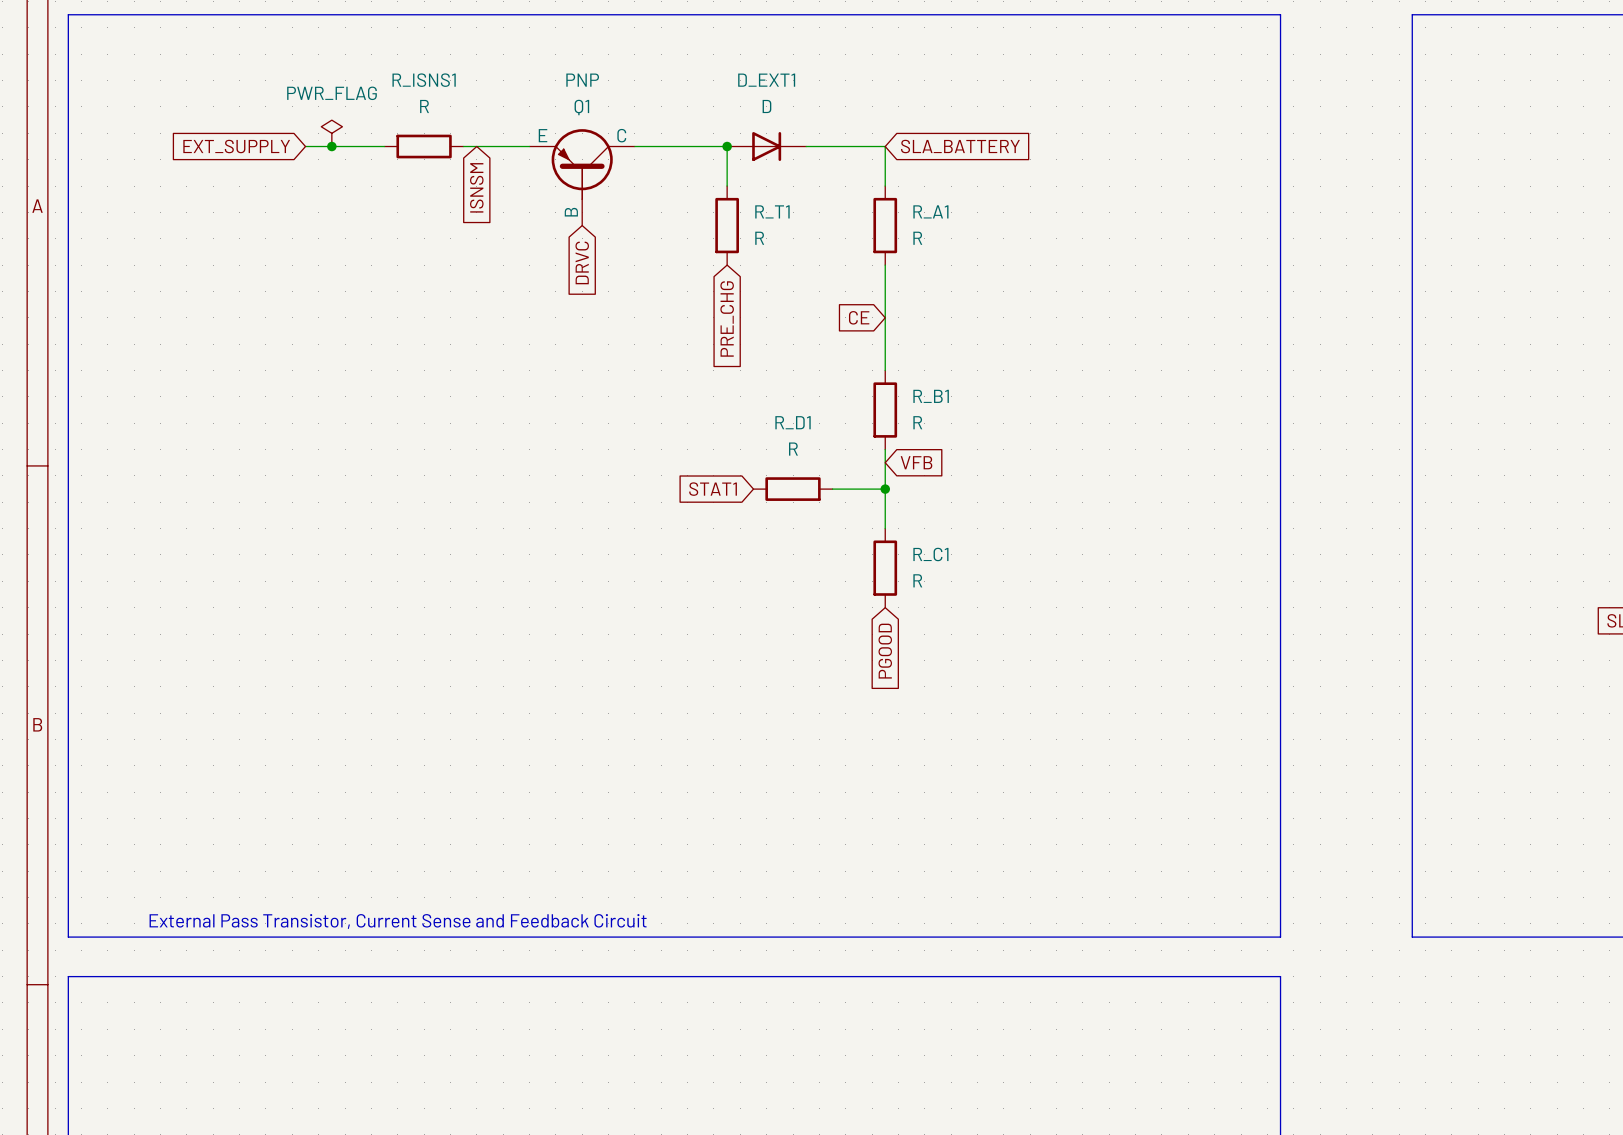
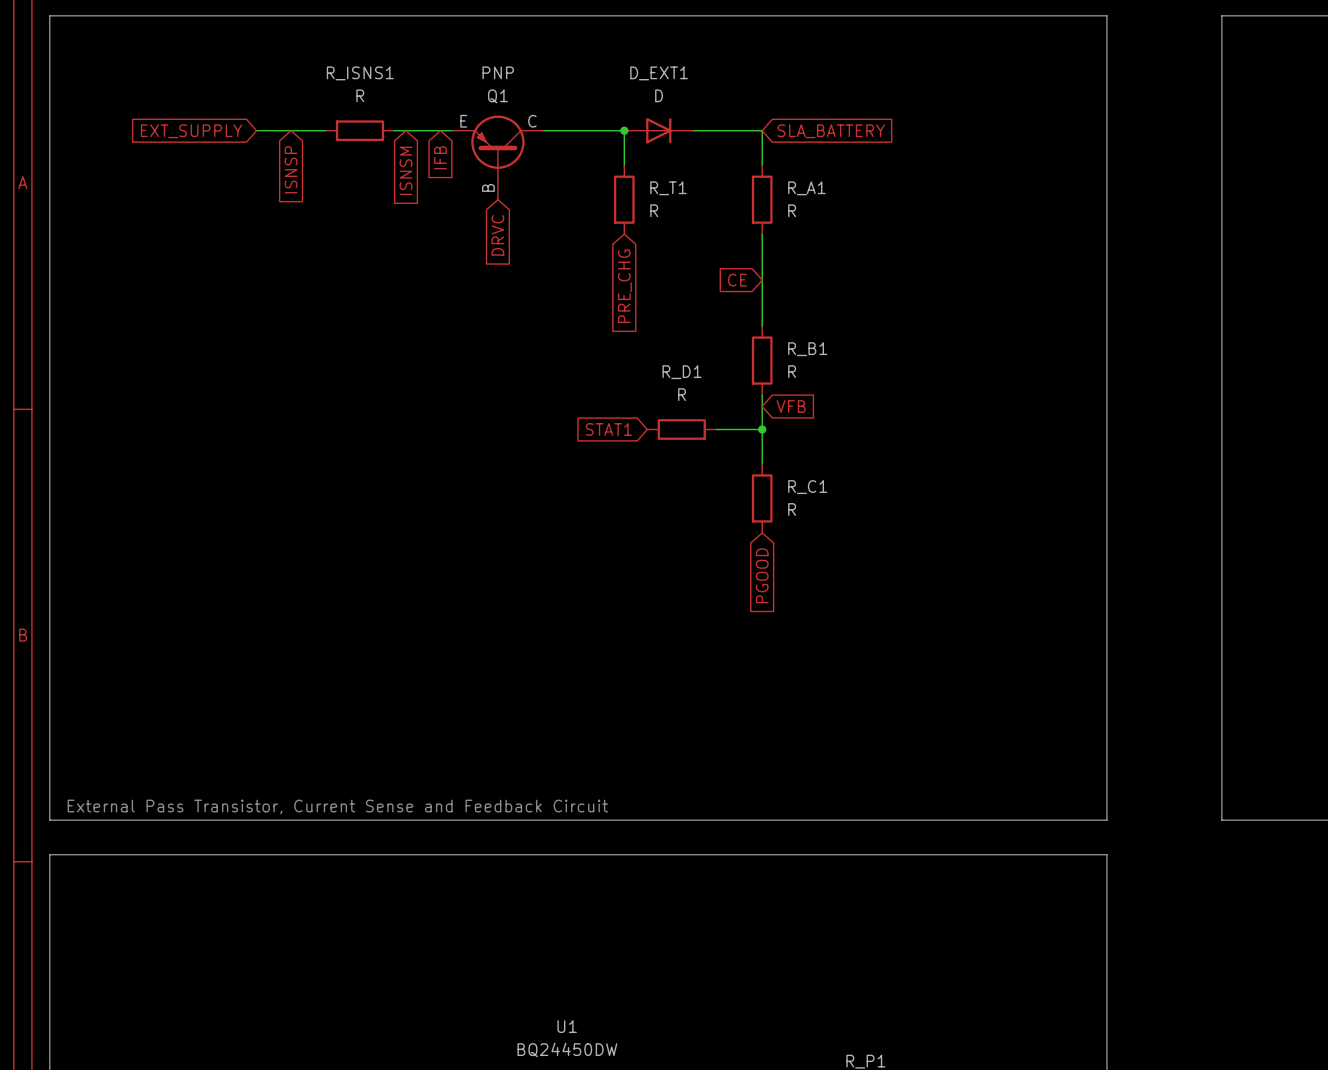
power symbol: PWR_FLAG (331, 133) -> none
junction: (331, 146) -> none
global label: none -> IFB (440, 157)
global label: none -> ISNSP (291, 169)

